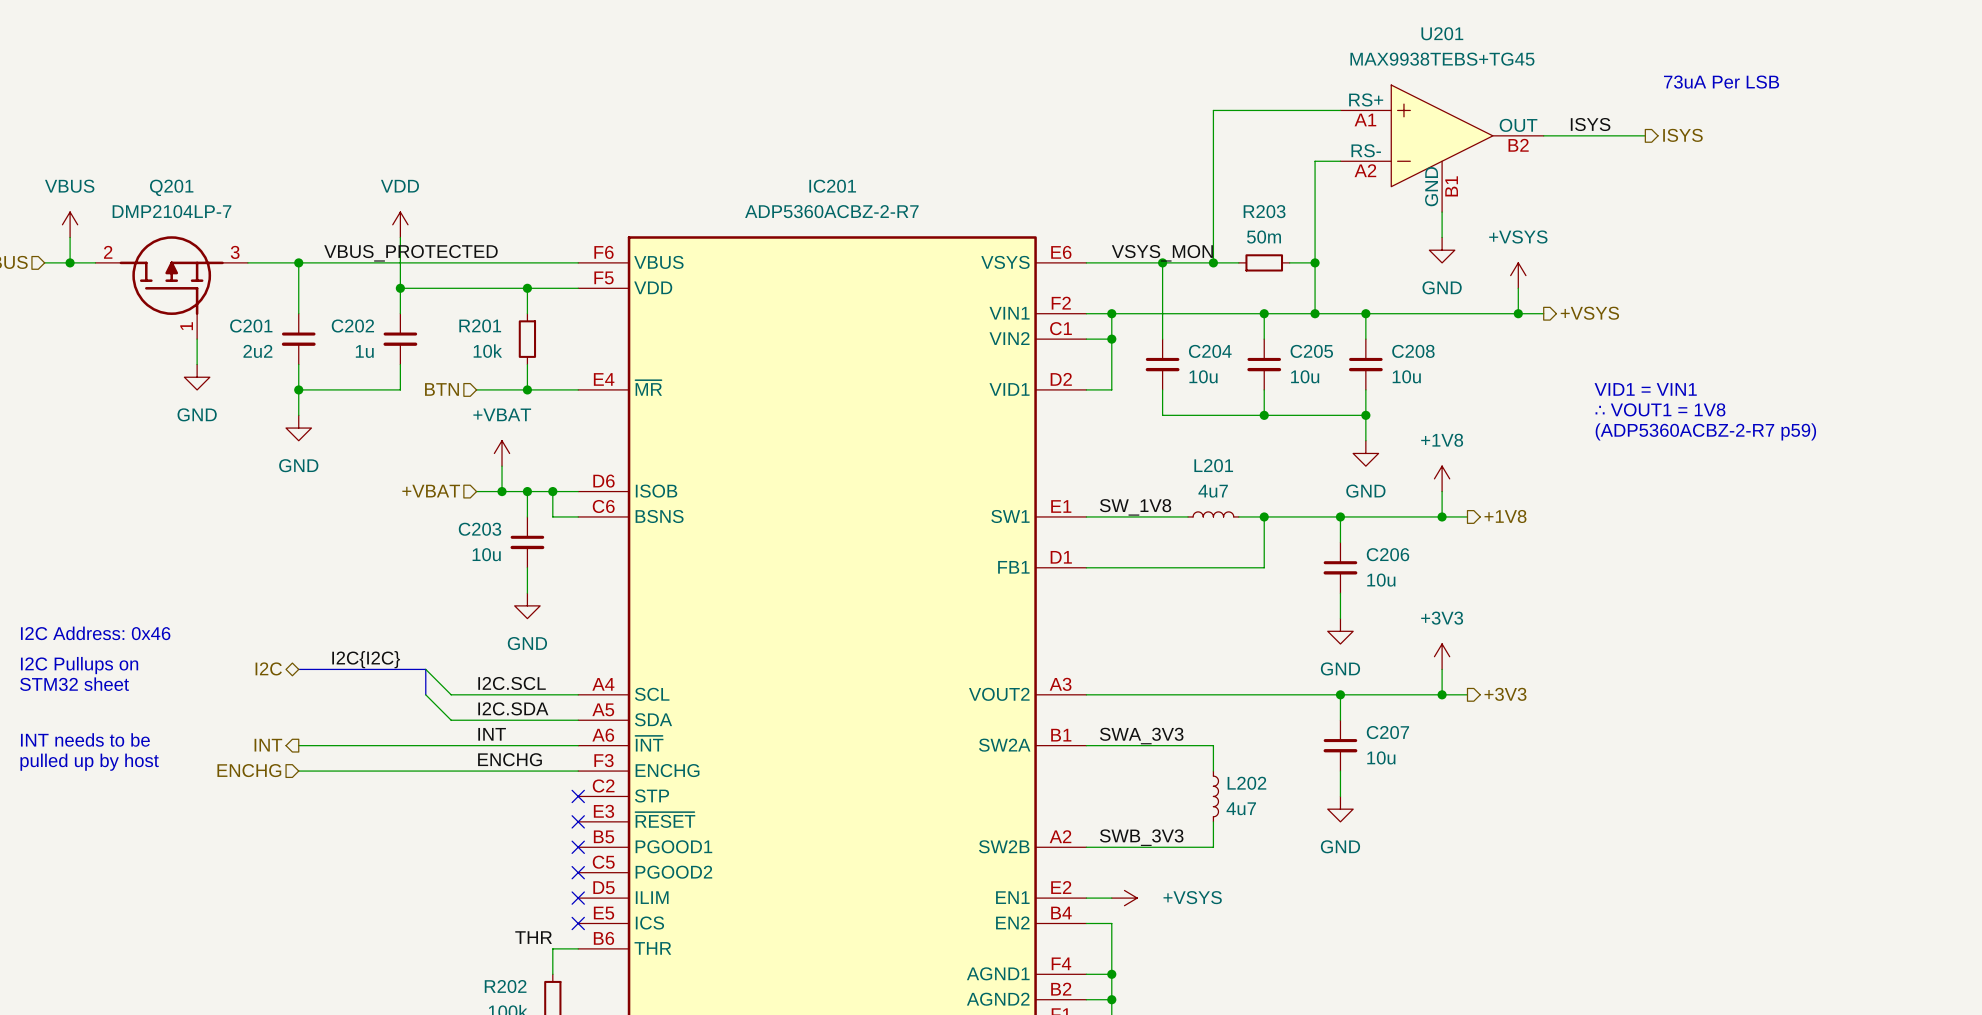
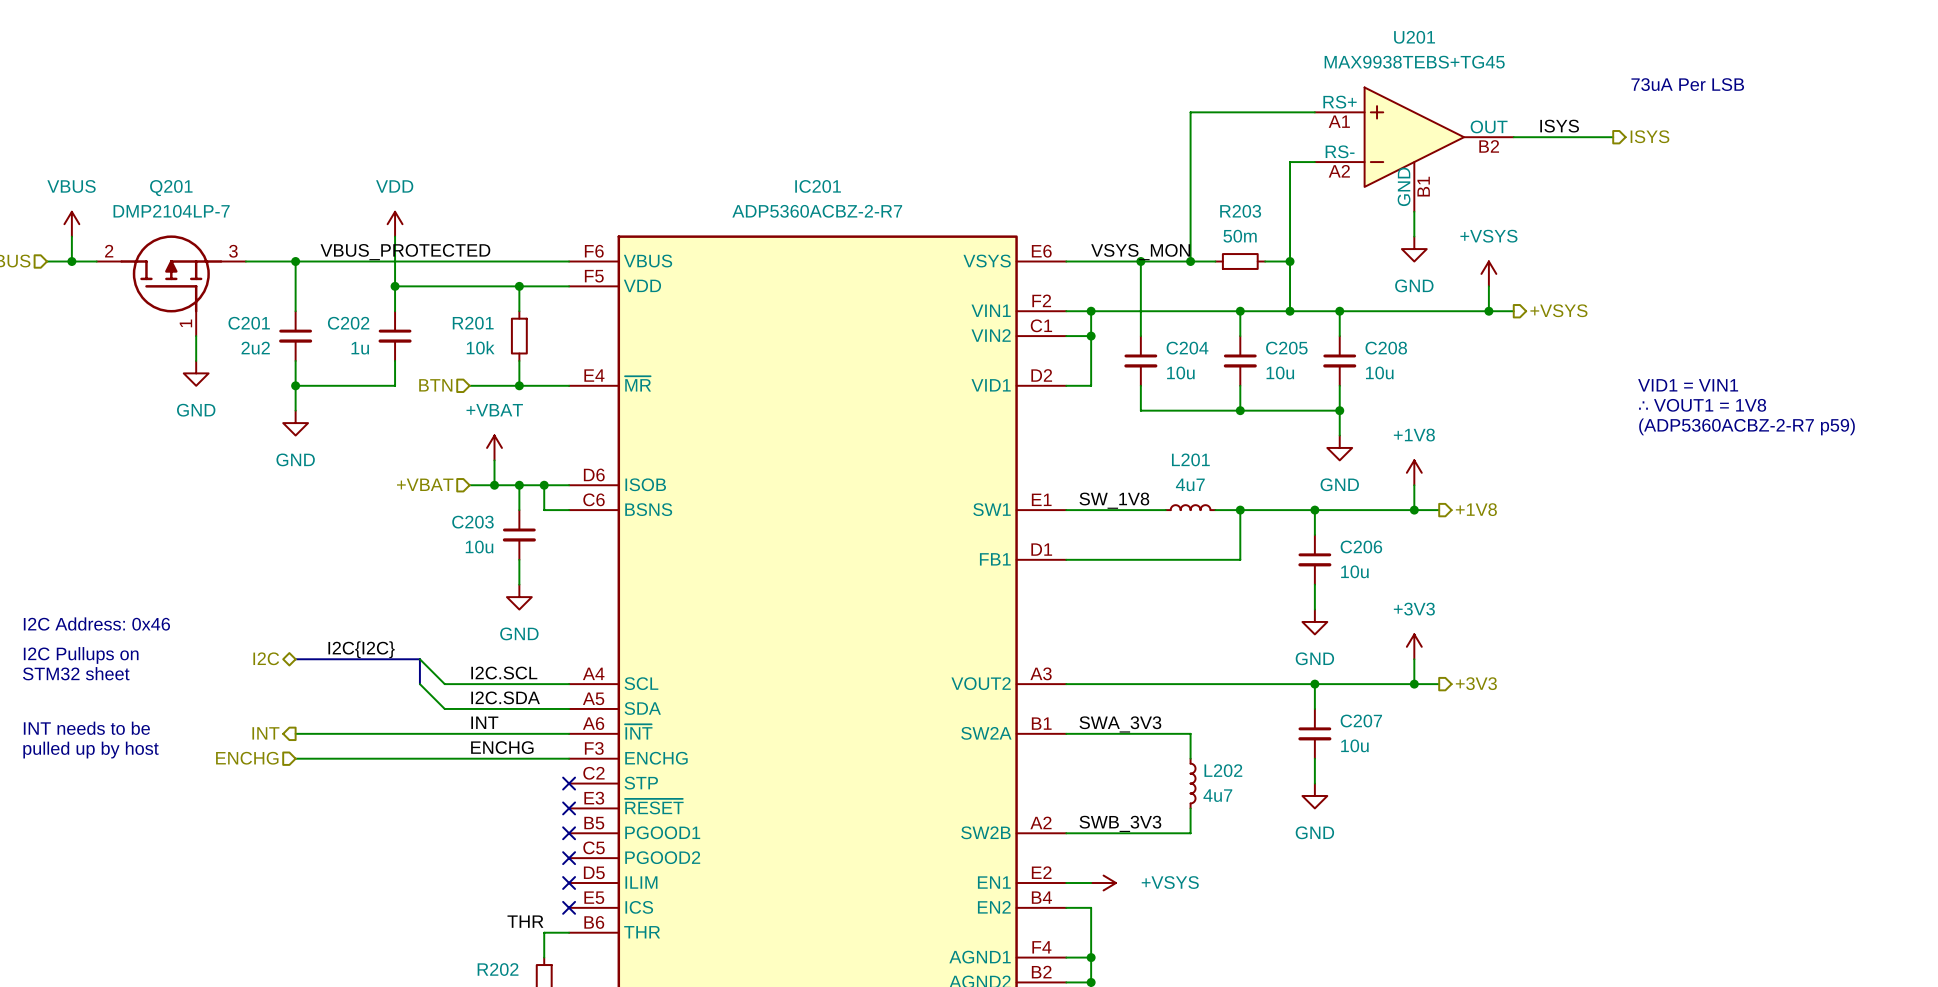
text position: VID1 = VIN1 (1645, 389) -> VID1 = VIN1 (1688, 385)
text position: ∴ VOUT1 = 1V8 (1660, 409) -> ∴ VOUT1 = 1V8 (1702, 405)
text position: (ADP5360ACBZ-2-R7 p59) (1705, 431) -> (ADP5360ACBZ-2-R7 p59) (1747, 426)

